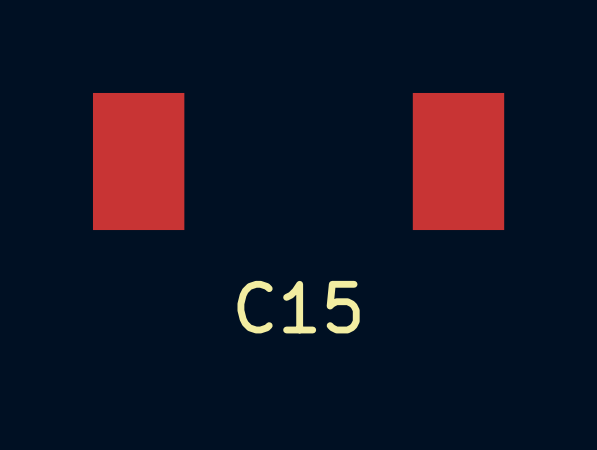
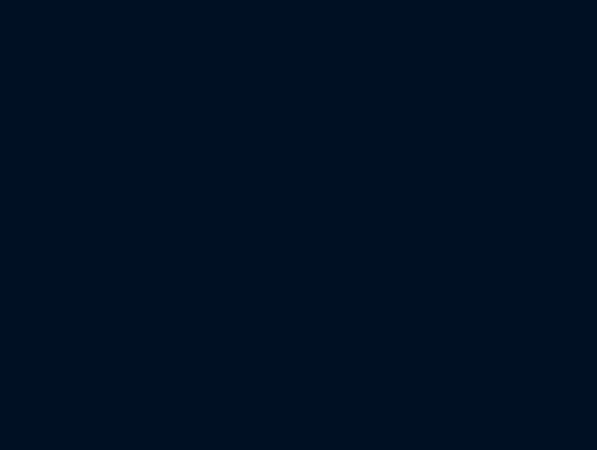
C15: (298, 161) -> none

